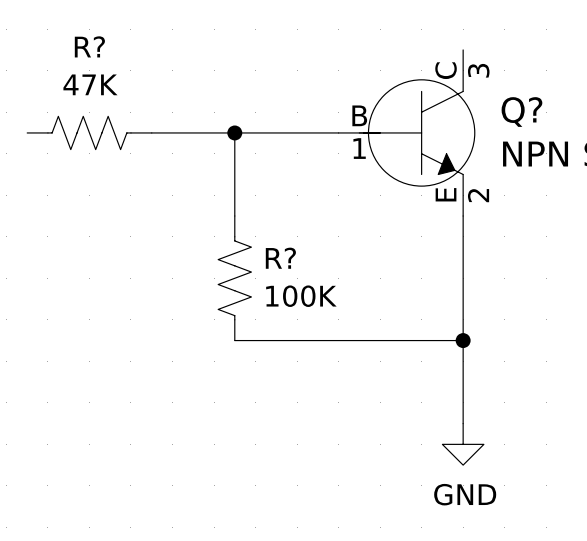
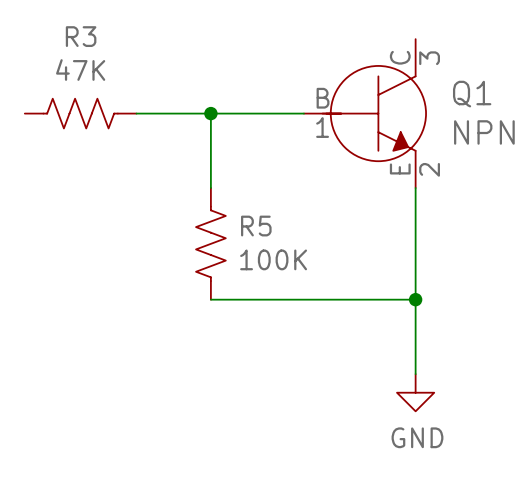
R? name: R? (89, 46) -> R3 (81, 36)
Q? name: Q? (521, 112) -> Q1 (472, 94)
R? name: R? (280, 258) -> R5 (256, 226)

